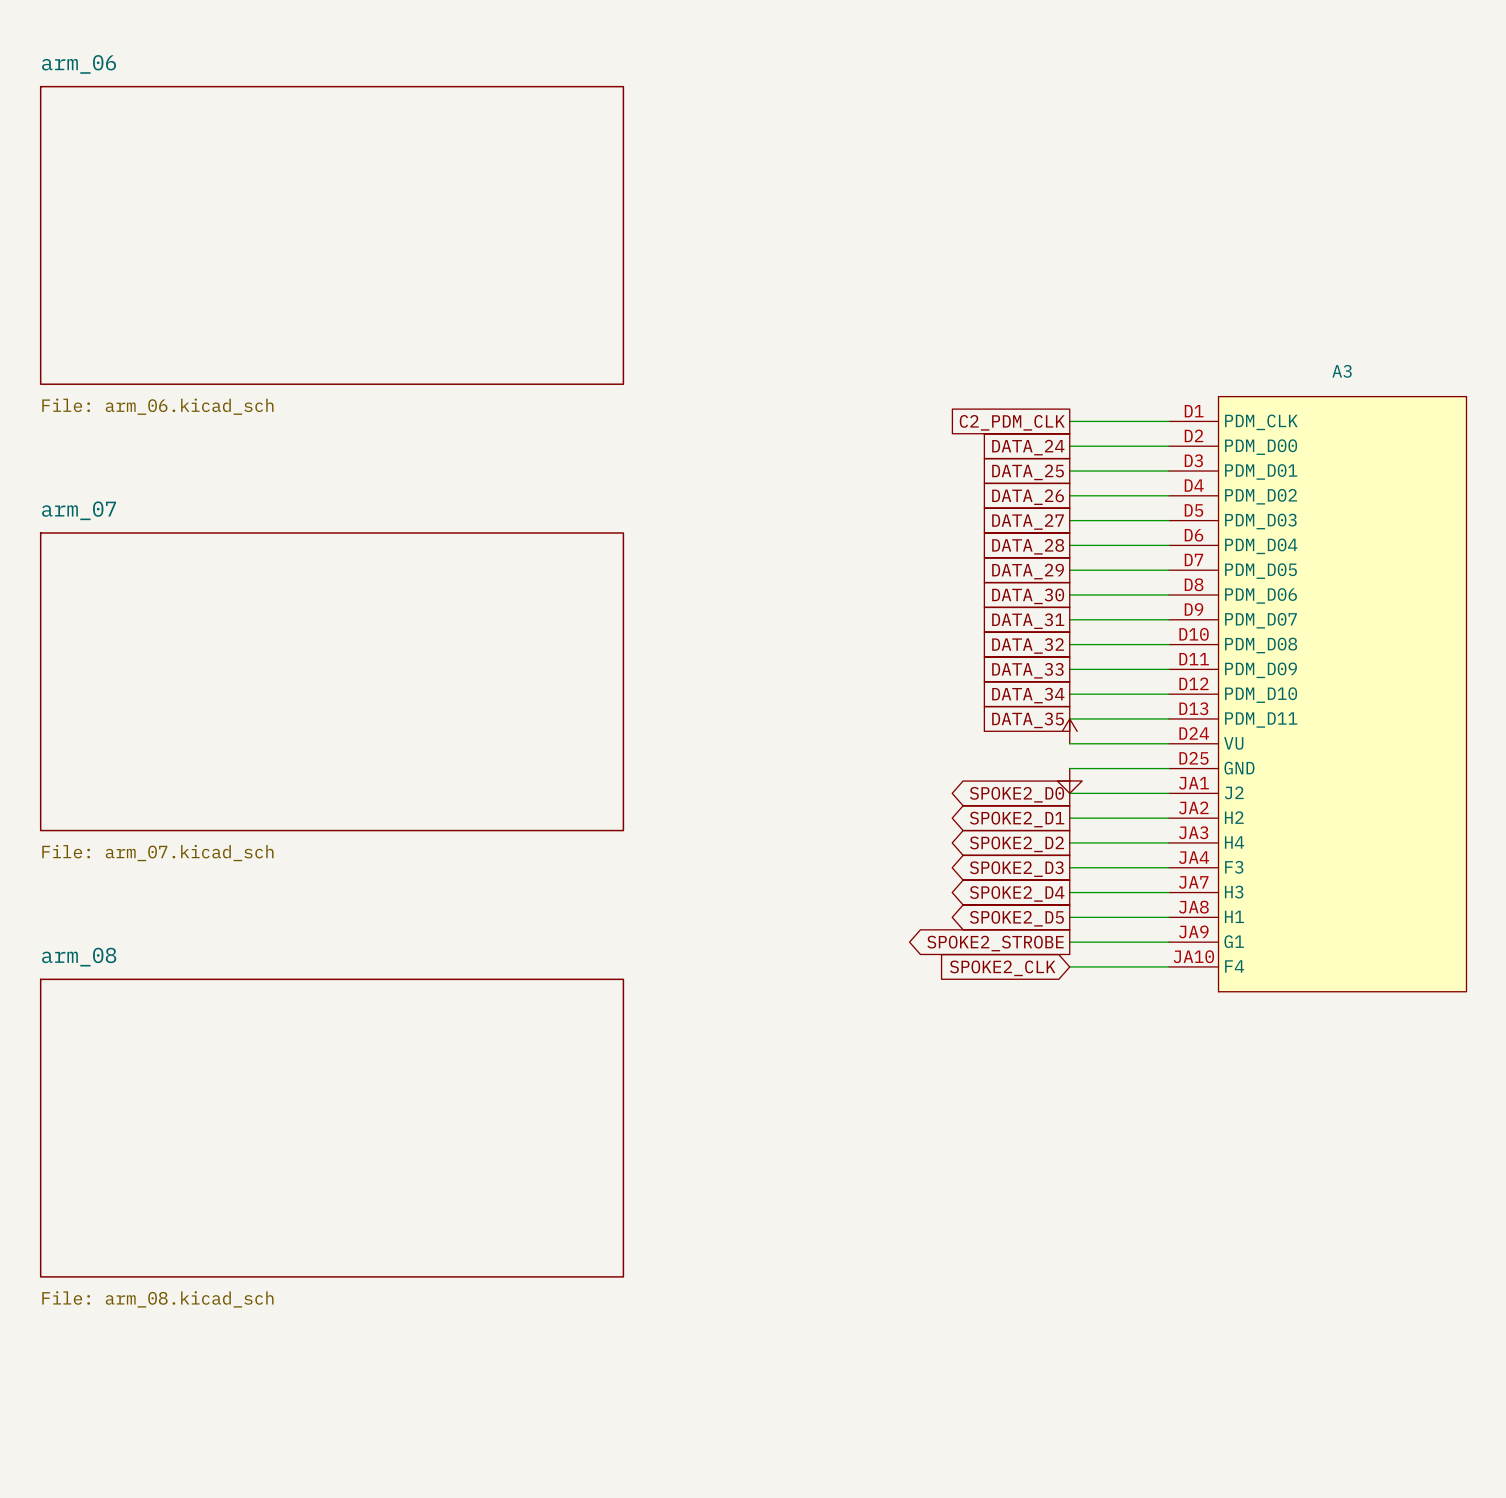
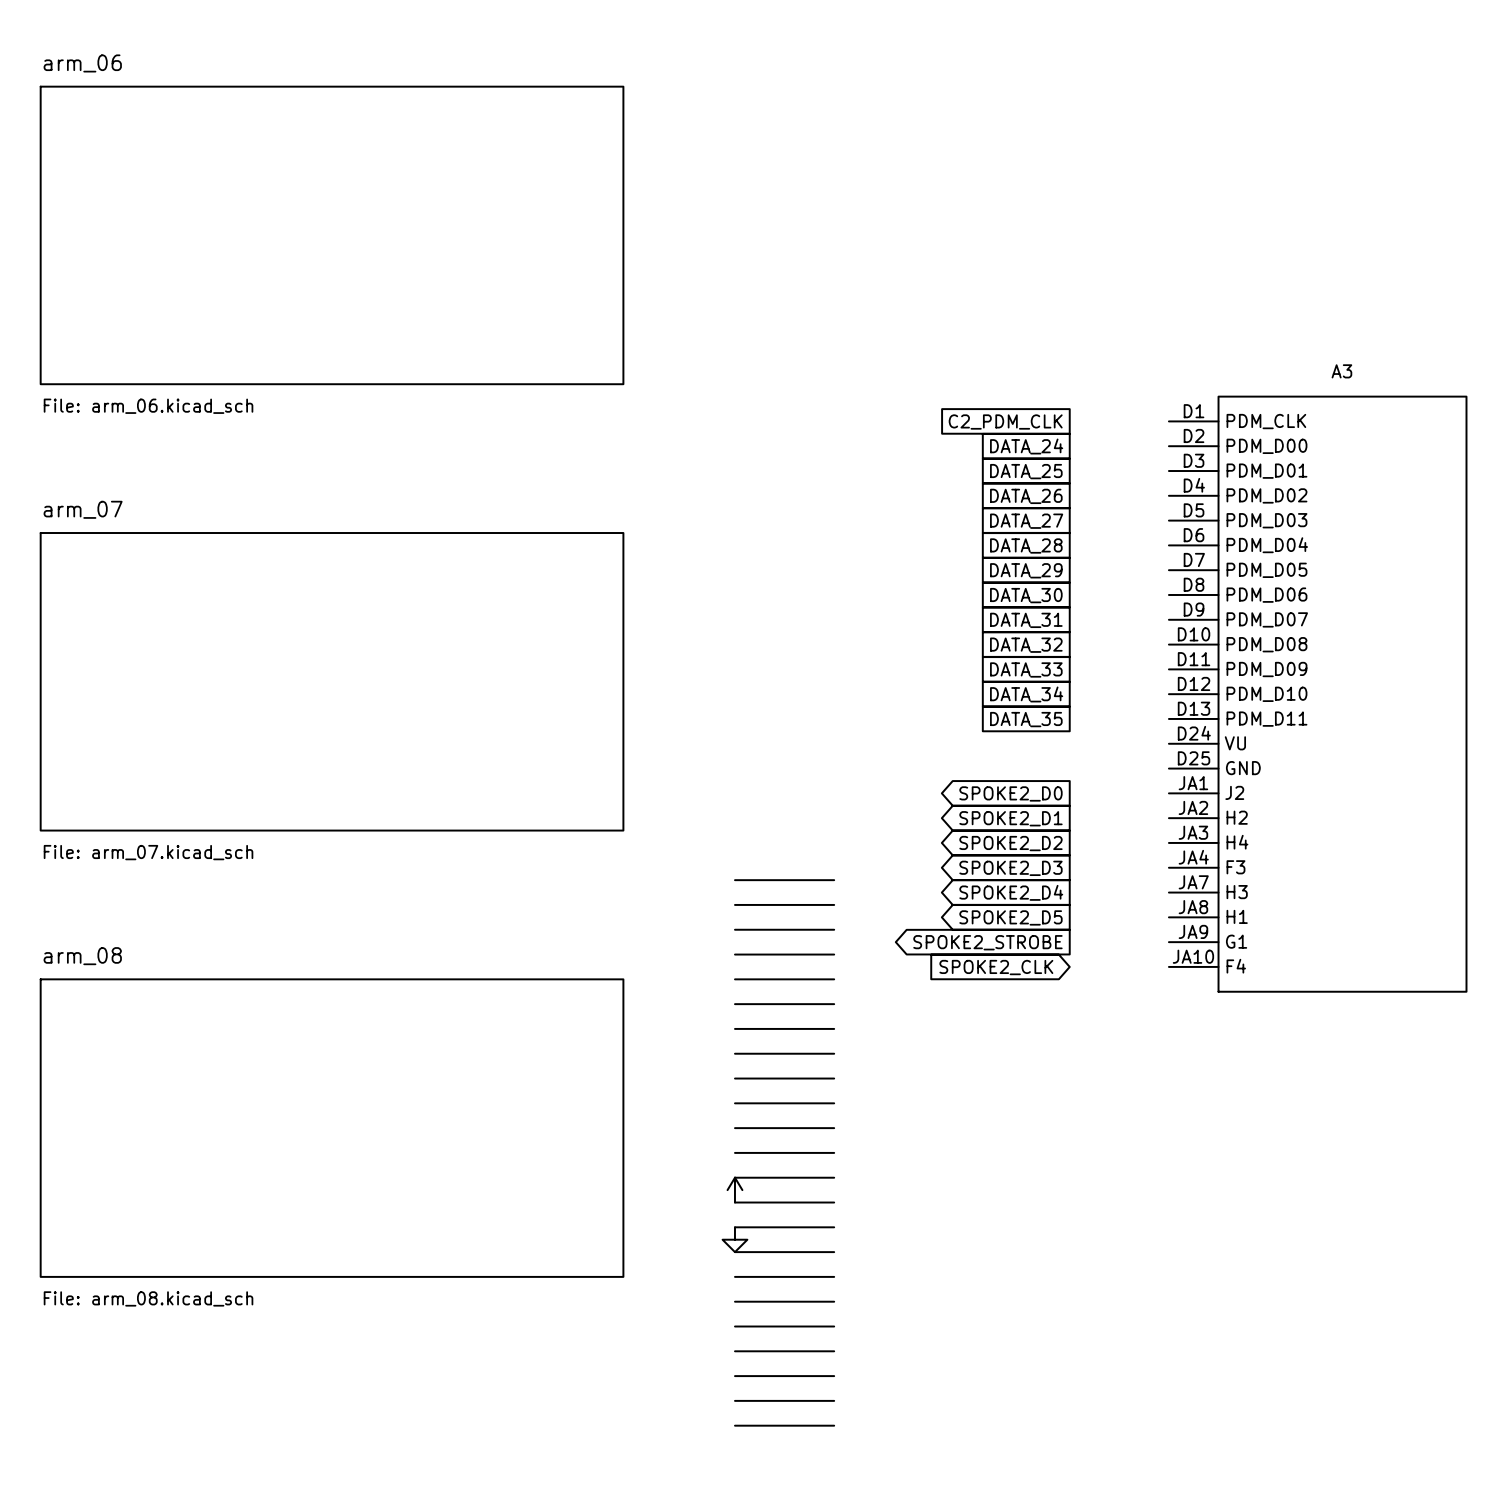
wire: (1069, 421) (1168, 421) -> none
wire: (1069, 446) (1168, 446) -> none
wire: (1069, 471) (1168, 471) -> none
wire: (1069, 495) (1168, 495) -> none
wire: (1069, 520) (1168, 520) -> none
wire: (1069, 545) (1168, 545) -> none
wire: (1069, 570) (1168, 570) -> none
wire: (1069, 594) (1168, 594) -> none
wire: (1069, 619) (1168, 619) -> none
wire: (1069, 644) (1168, 644) -> none
wire: (1069, 669) (1168, 669) -> none
wire: (1069, 694) (1168, 694) -> none
wire: (1069, 718) (1168, 718) -> none
power symbol: (1069, 731) -> none
wire: (1069, 743) (1168, 743) -> none
wire: (1069, 768) (1168, 768) -> none
power symbol: (1069, 780) -> none
wire: (1069, 793) (1168, 793) -> none
wire: (1069, 818) (1168, 818) -> none
wire: (1069, 842) (1168, 842) -> none
wire: (1069, 867) (1168, 867) -> none
wire: none -> (734, 880) (834, 880)
wire: (1069, 892) (1168, 892) -> none
wire: none -> (734, 904) (834, 904)
wire: (1069, 917) (1168, 917) -> none
wire: none -> (734, 929) (834, 929)
wire: (1069, 942) (1168, 942) -> none
wire: none -> (734, 954) (834, 954)
wire: (1069, 966) (1168, 966) -> none
wire: none -> (734, 979) (834, 979)
wire: none -> (734, 1004) (834, 1004)
wire: none -> (734, 1028) (834, 1028)
wire: none -> (734, 1053) (834, 1053)
wire: none -> (734, 1078) (834, 1078)
wire: none -> (734, 1103) (834, 1103)
wire: none -> (734, 1128) (834, 1128)
wire: none -> (734, 1152) (834, 1152)
wire: none -> (734, 1177) (834, 1177)
power symbol: none -> (734, 1190)
wire: none -> (734, 1202) (834, 1202)
wire: none -> (734, 1227) (834, 1227)
power symbol: none -> (734, 1239)
wire: none -> (734, 1252) (834, 1252)
wire: none -> (734, 1276) (834, 1276)
wire: none -> (734, 1301) (834, 1301)
wire: none -> (734, 1326) (834, 1326)
wire: none -> (734, 1351) (834, 1351)
wire: none -> (734, 1376) (834, 1376)
wire: none -> (734, 1400) (834, 1400)
wire: none -> (734, 1425) (834, 1425)

